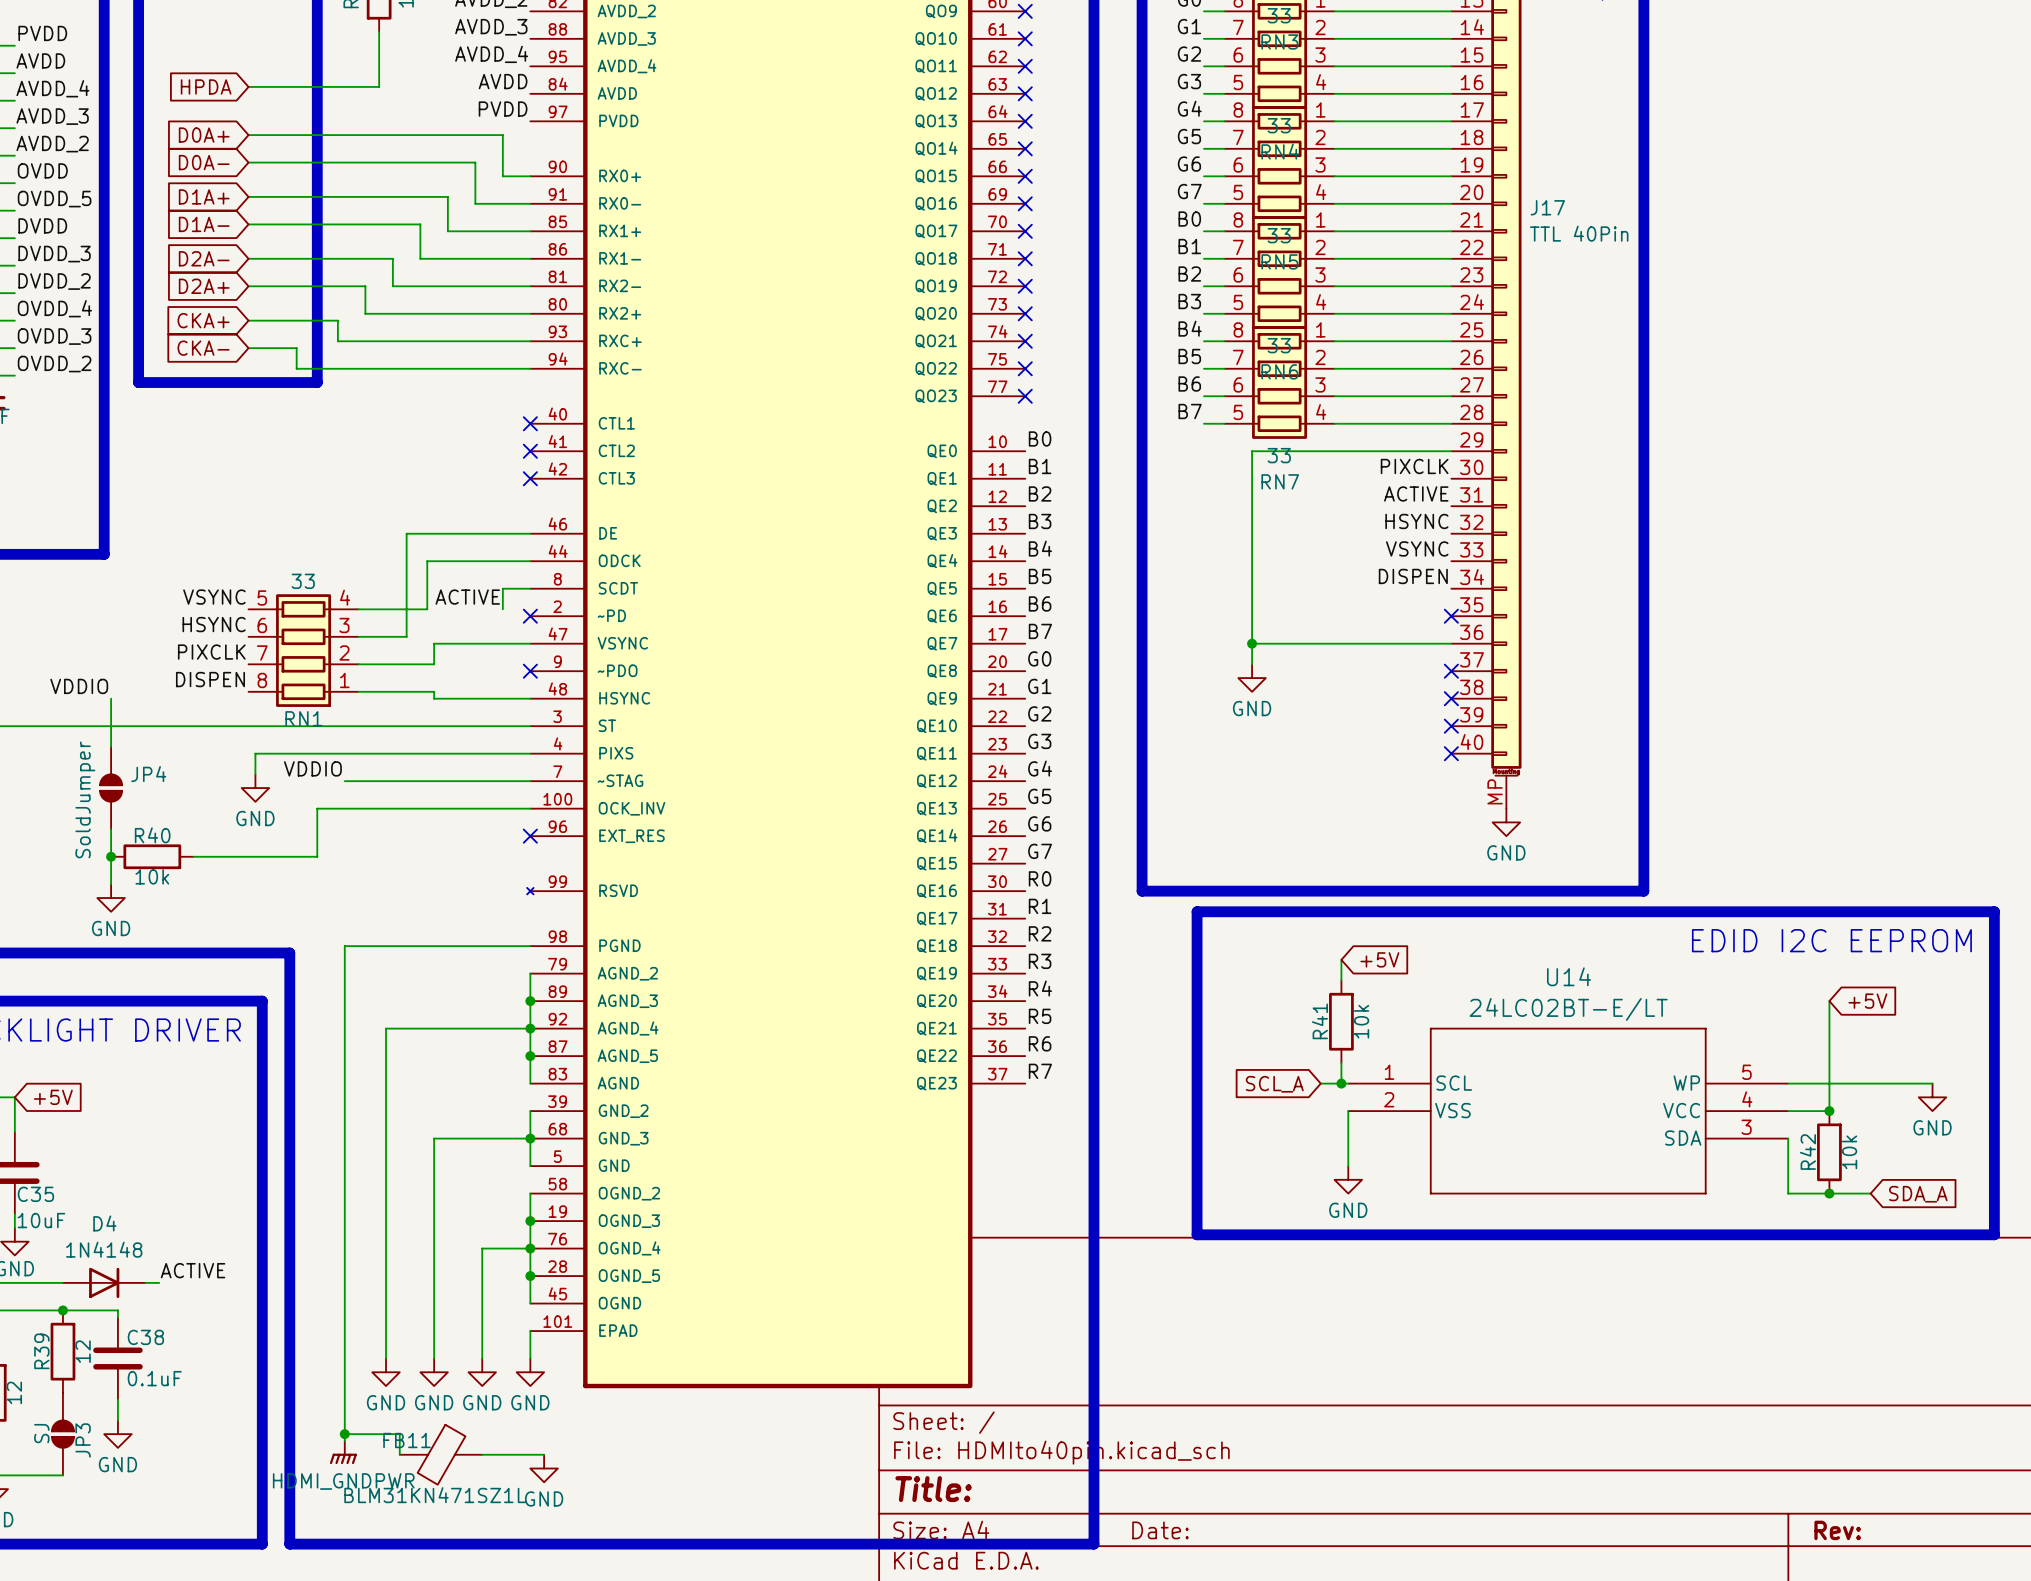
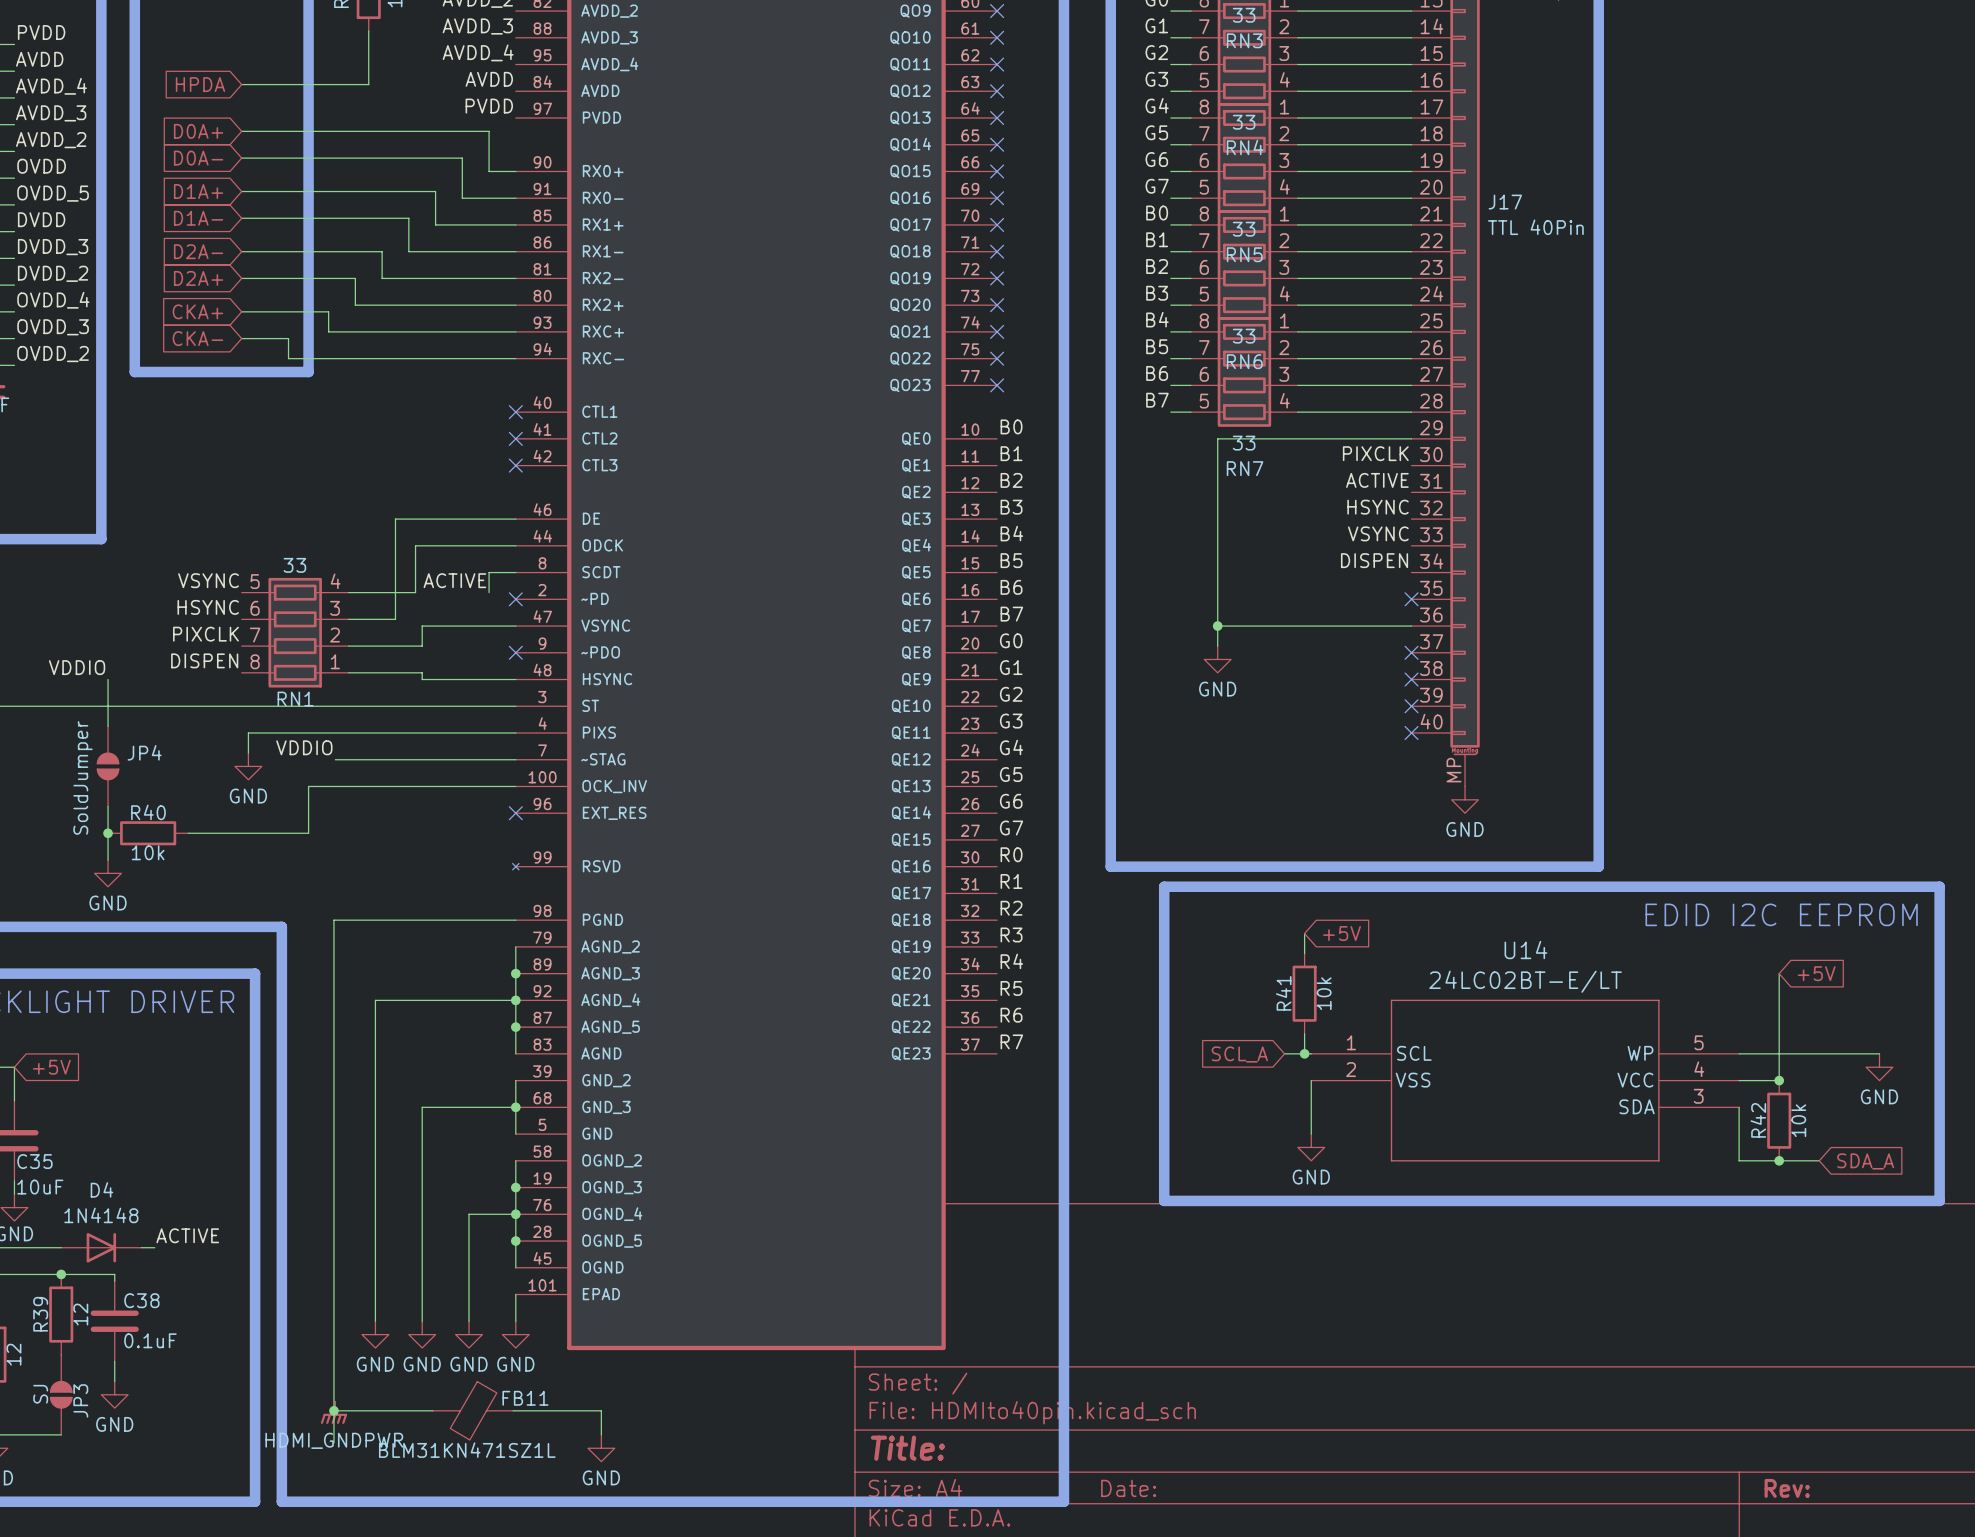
wire: (344, 946) (344, 1441) -> (335, 920) (333, 1442)
wire: (344, 1434) (399, 1434) (399, 1454) -> none
junction position: (344, 1434) -> (333, 1410)
FB11 name position: FB11 (406, 1440) -> FB11 (525, 1398)
wire: none -> (333, 1410) (432, 1410)
wire: none -> (513, 1410) (601, 1410) (601, 1434)
FB11 position: (441, 1454) -> (473, 1410)
wire: (482, 1454) (544, 1454) -> none
power symbol position: GND (544, 1468) -> GND (601, 1448)

